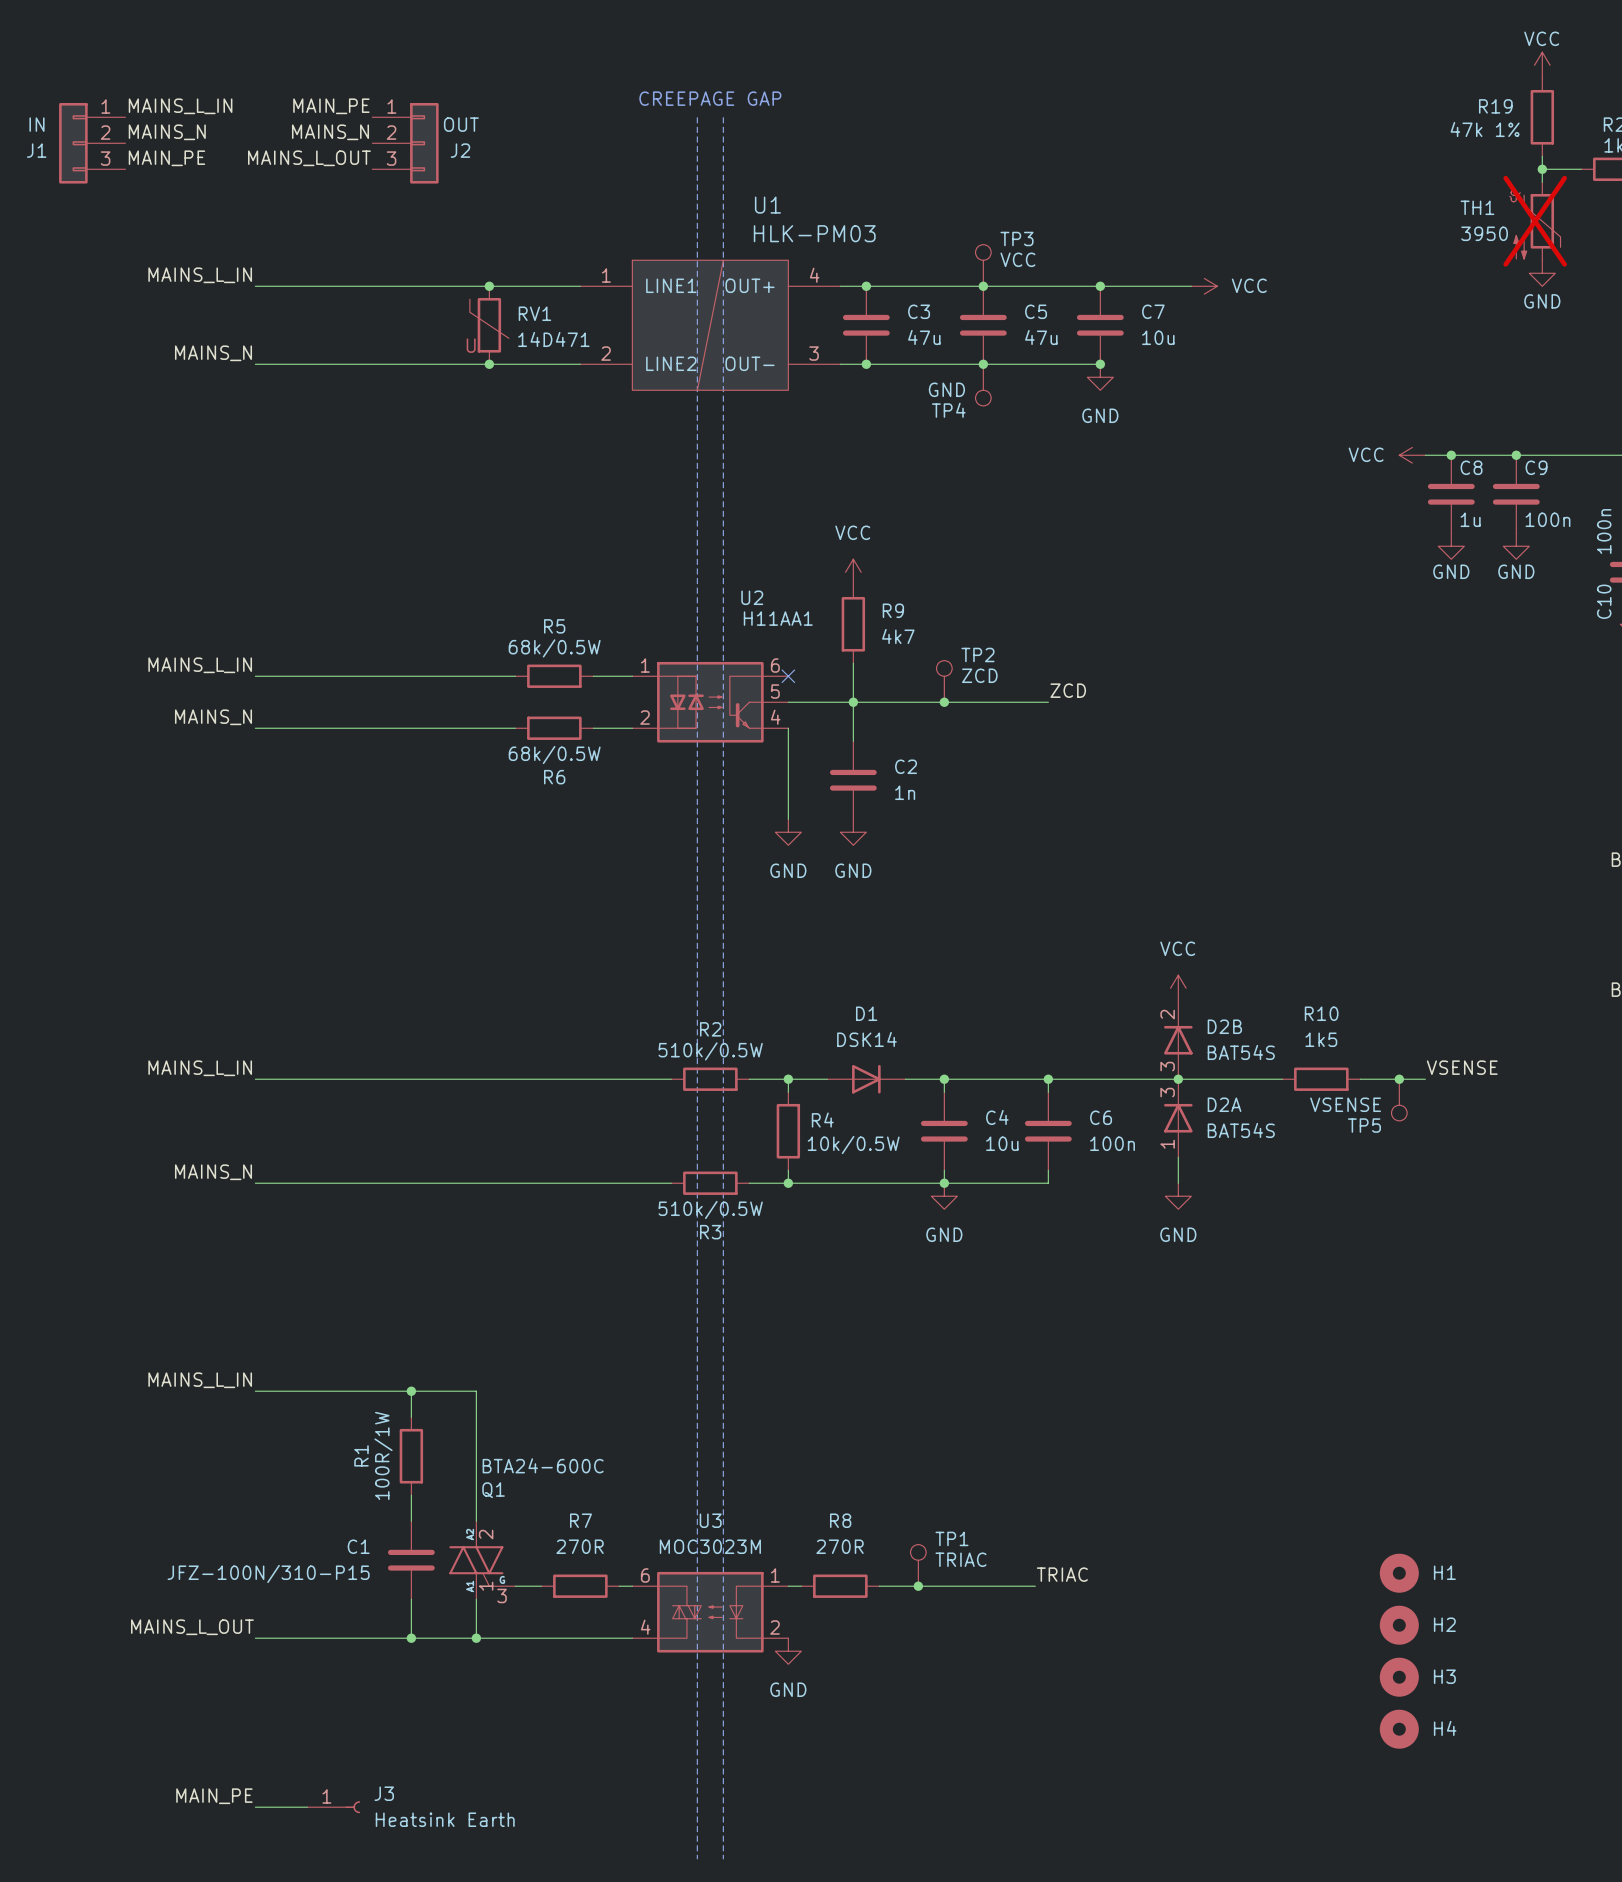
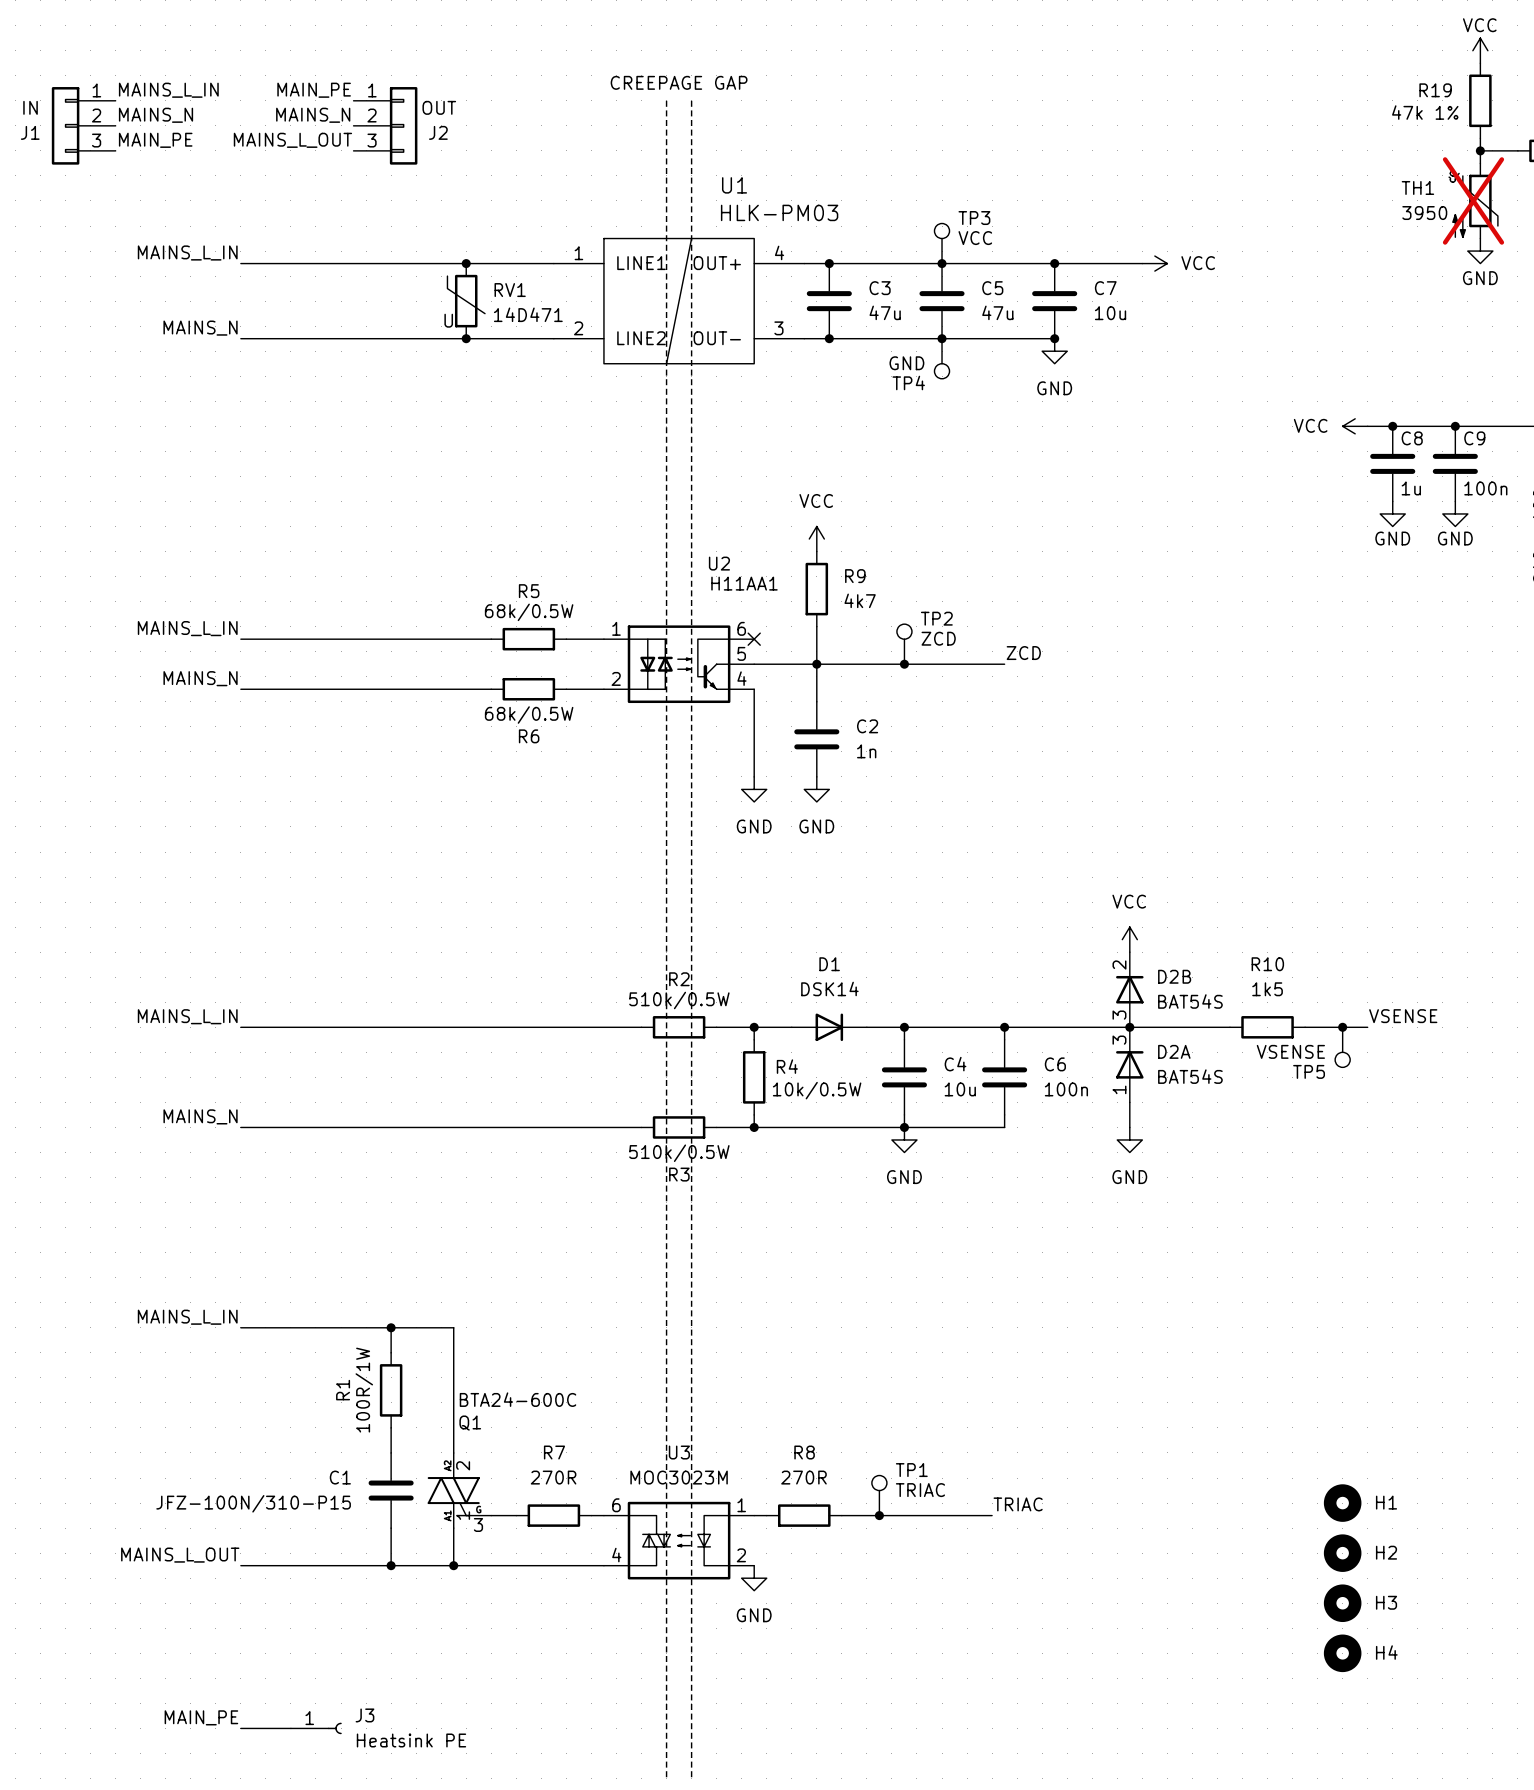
J3 value: Heatsink Earth (445, 1819) -> Heatsink PE (411, 1740)

